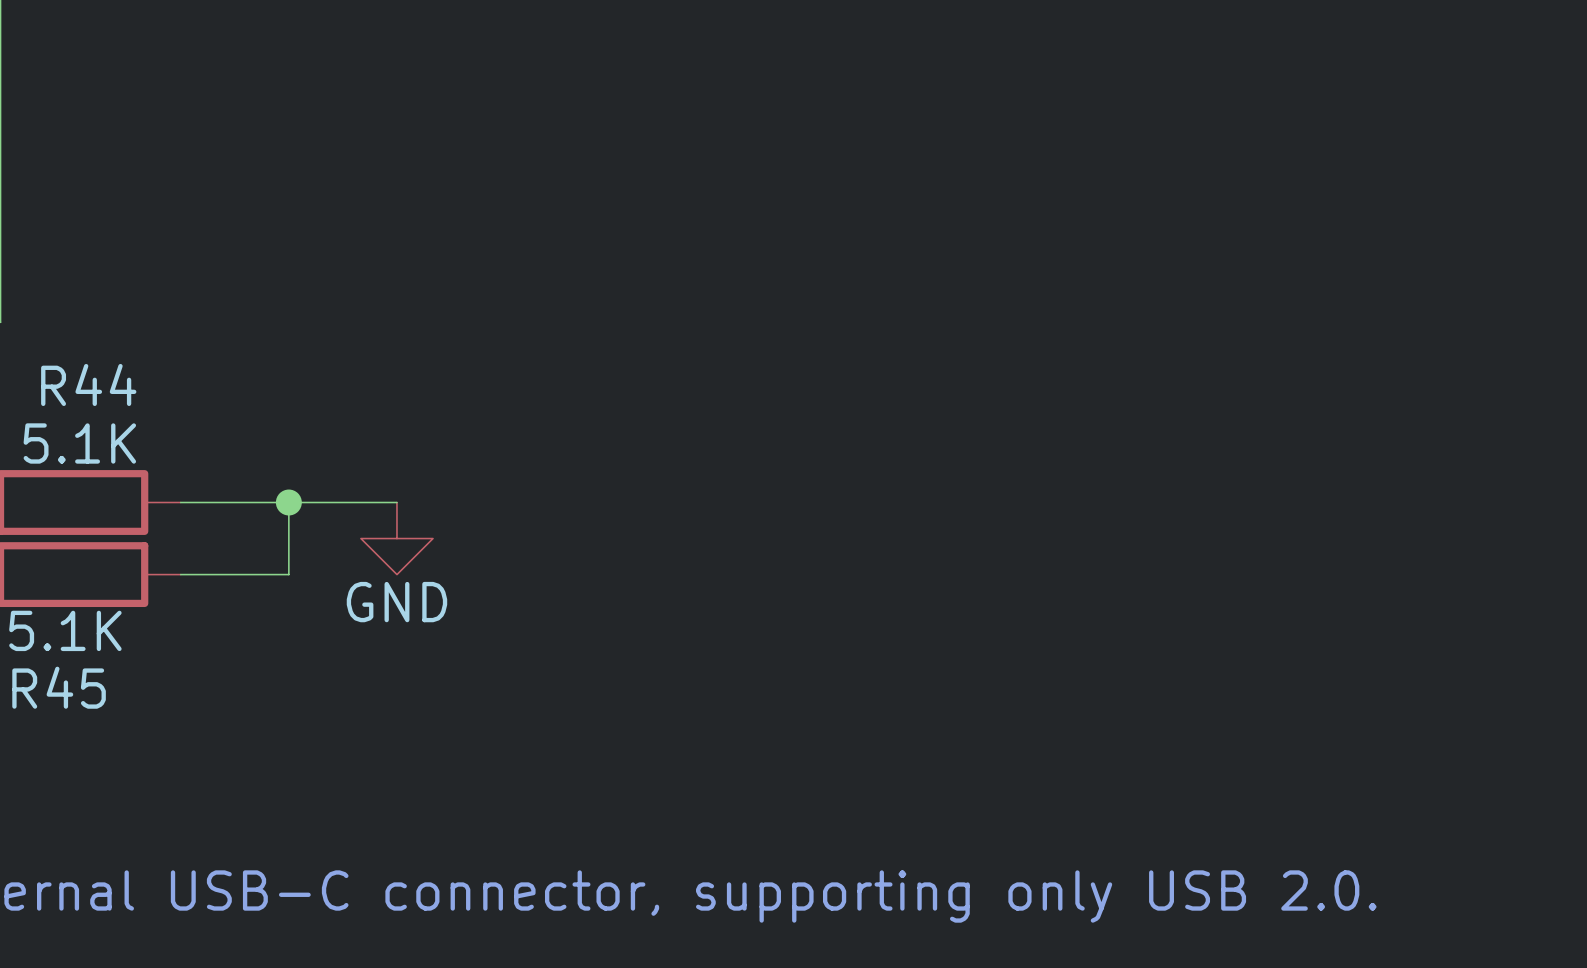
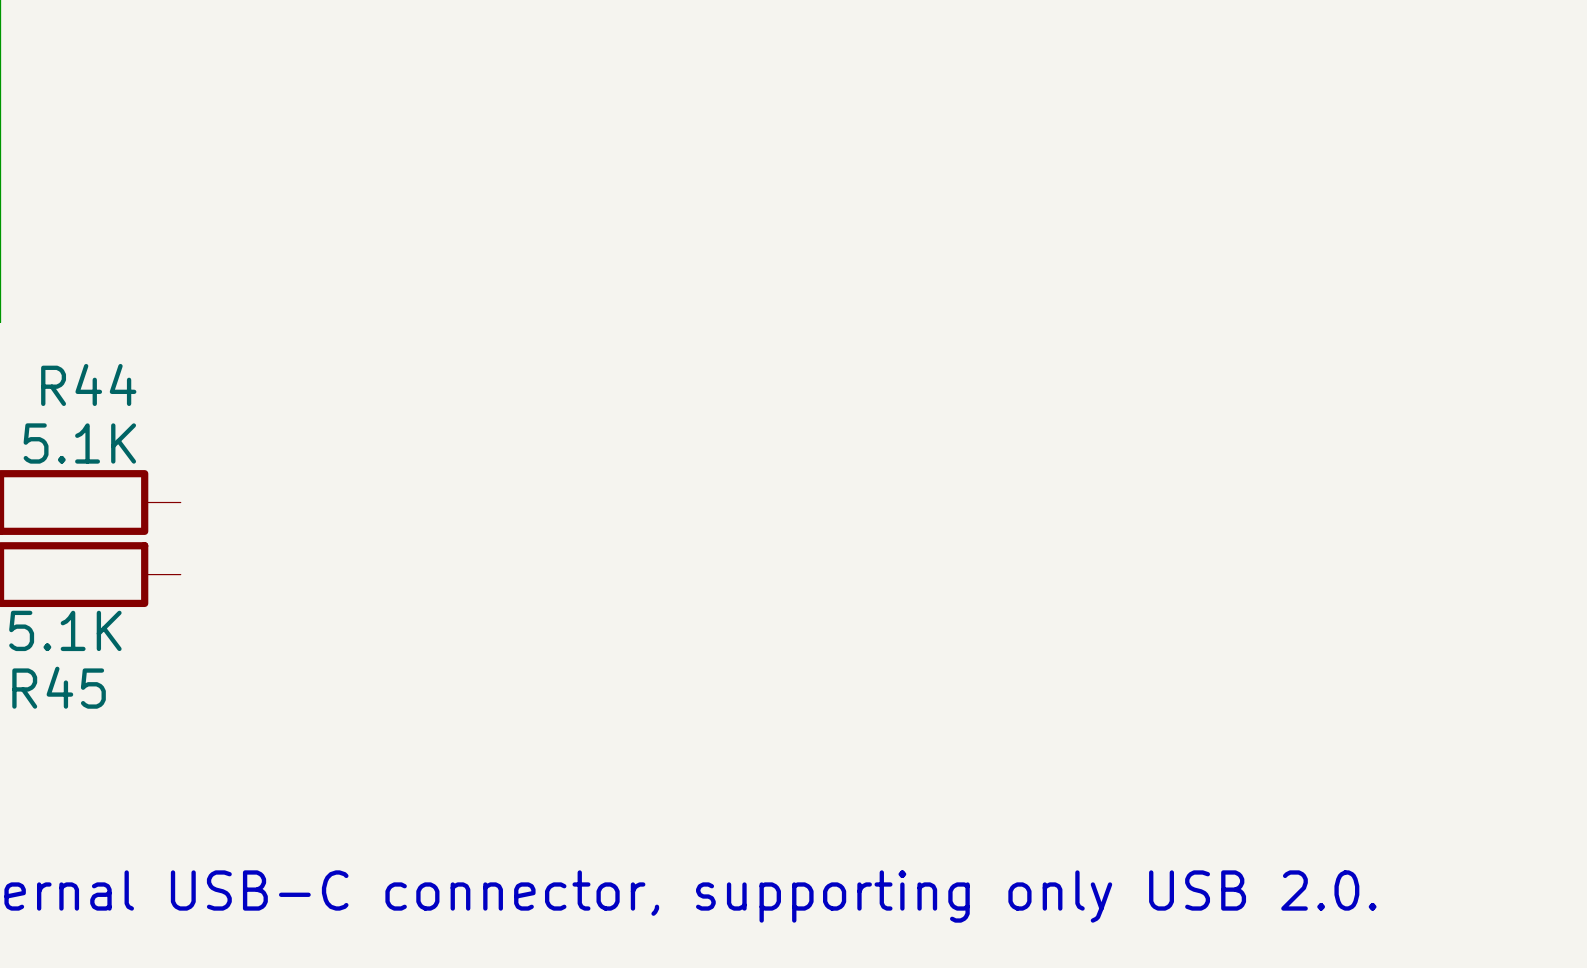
wire: (180, 502) (396, 502) -> none
wire: (288, 502) (288, 574) (180, 574) -> none
junction: (288, 502) -> none
power symbol: GND (396, 538) -> none

